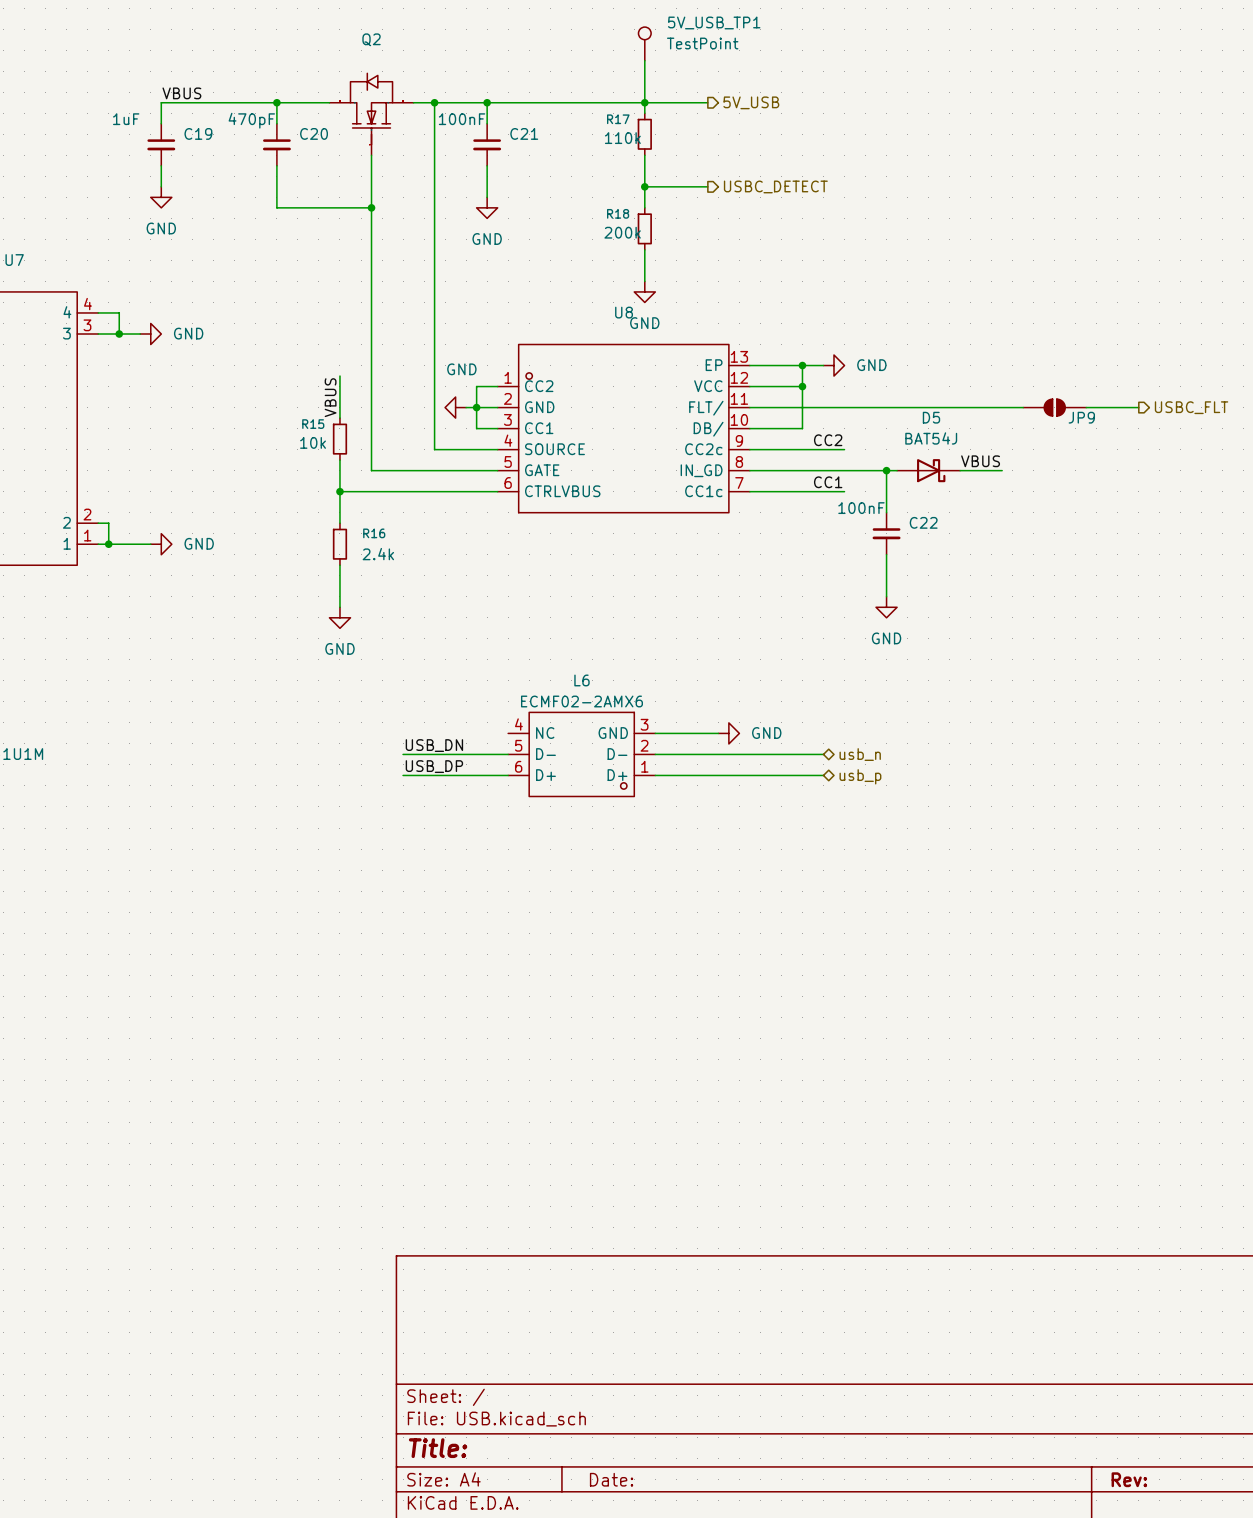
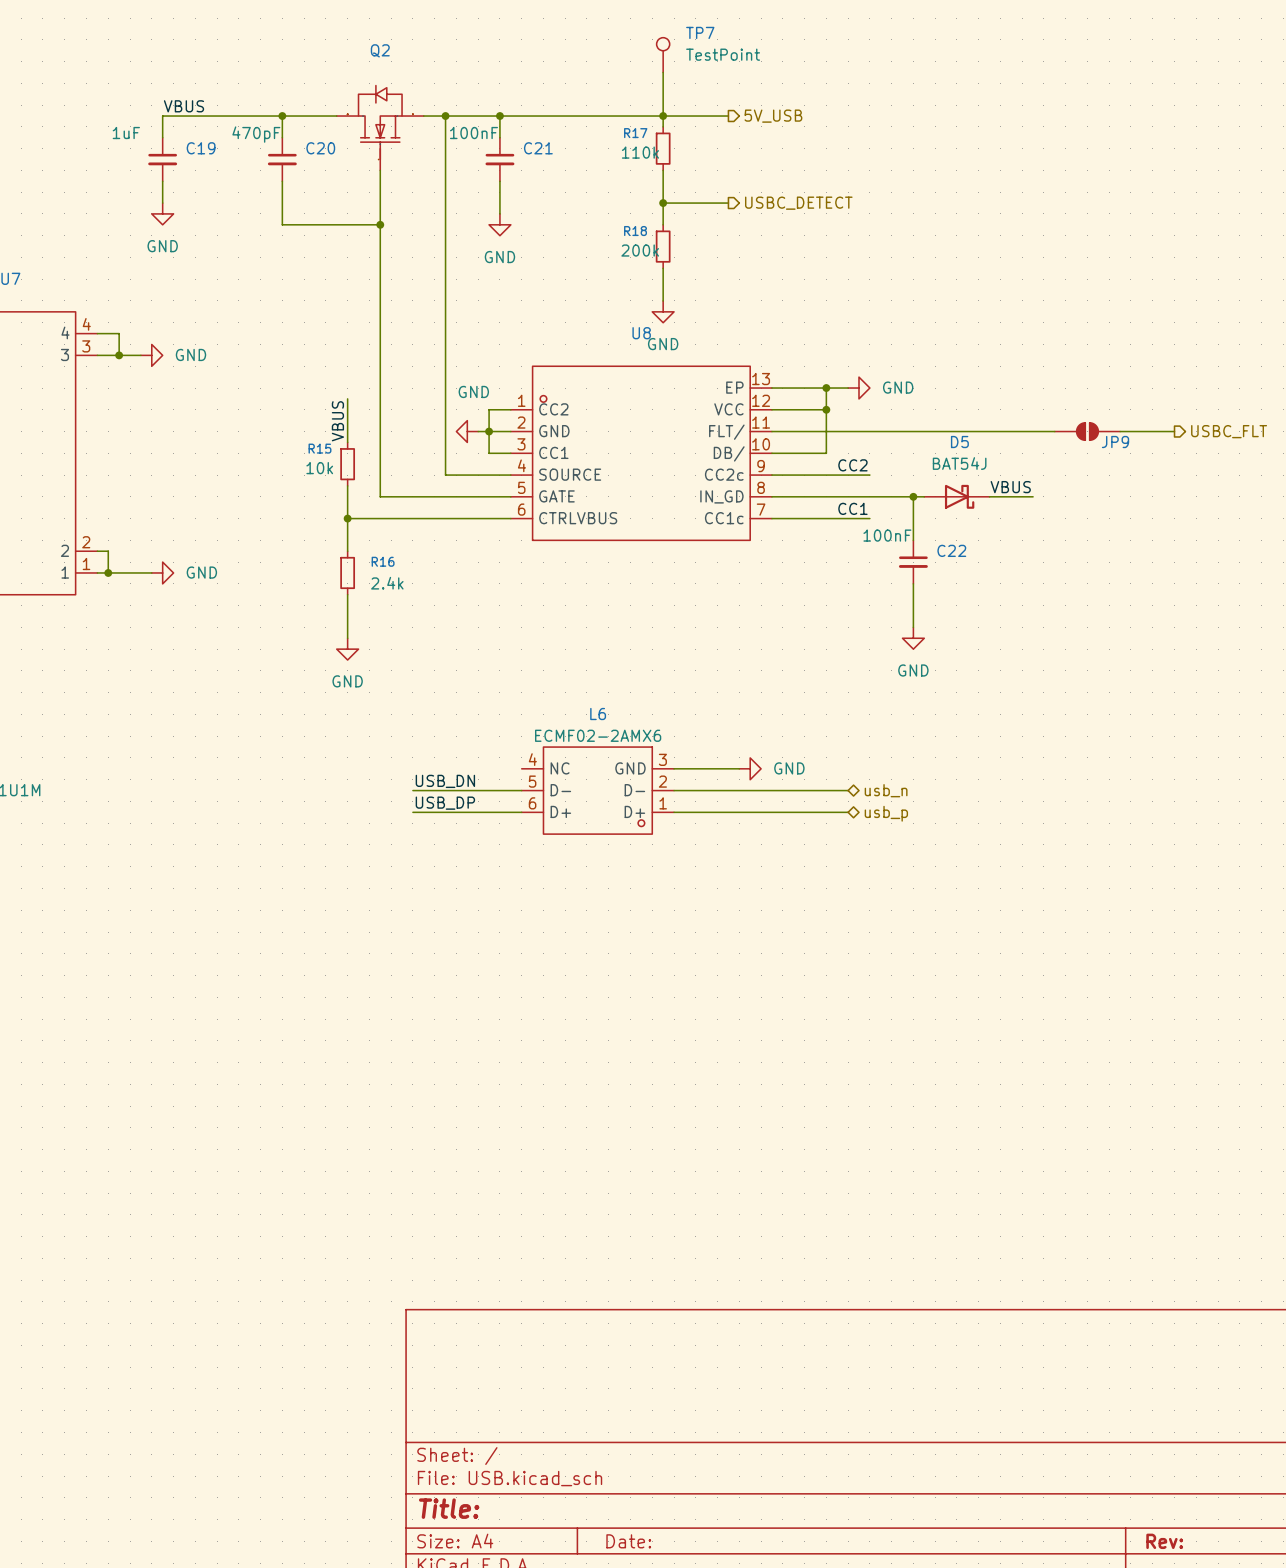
5V_USB_TP1 name: 5V_USB_TP1 (714, 22) -> TP7 (700, 32)

